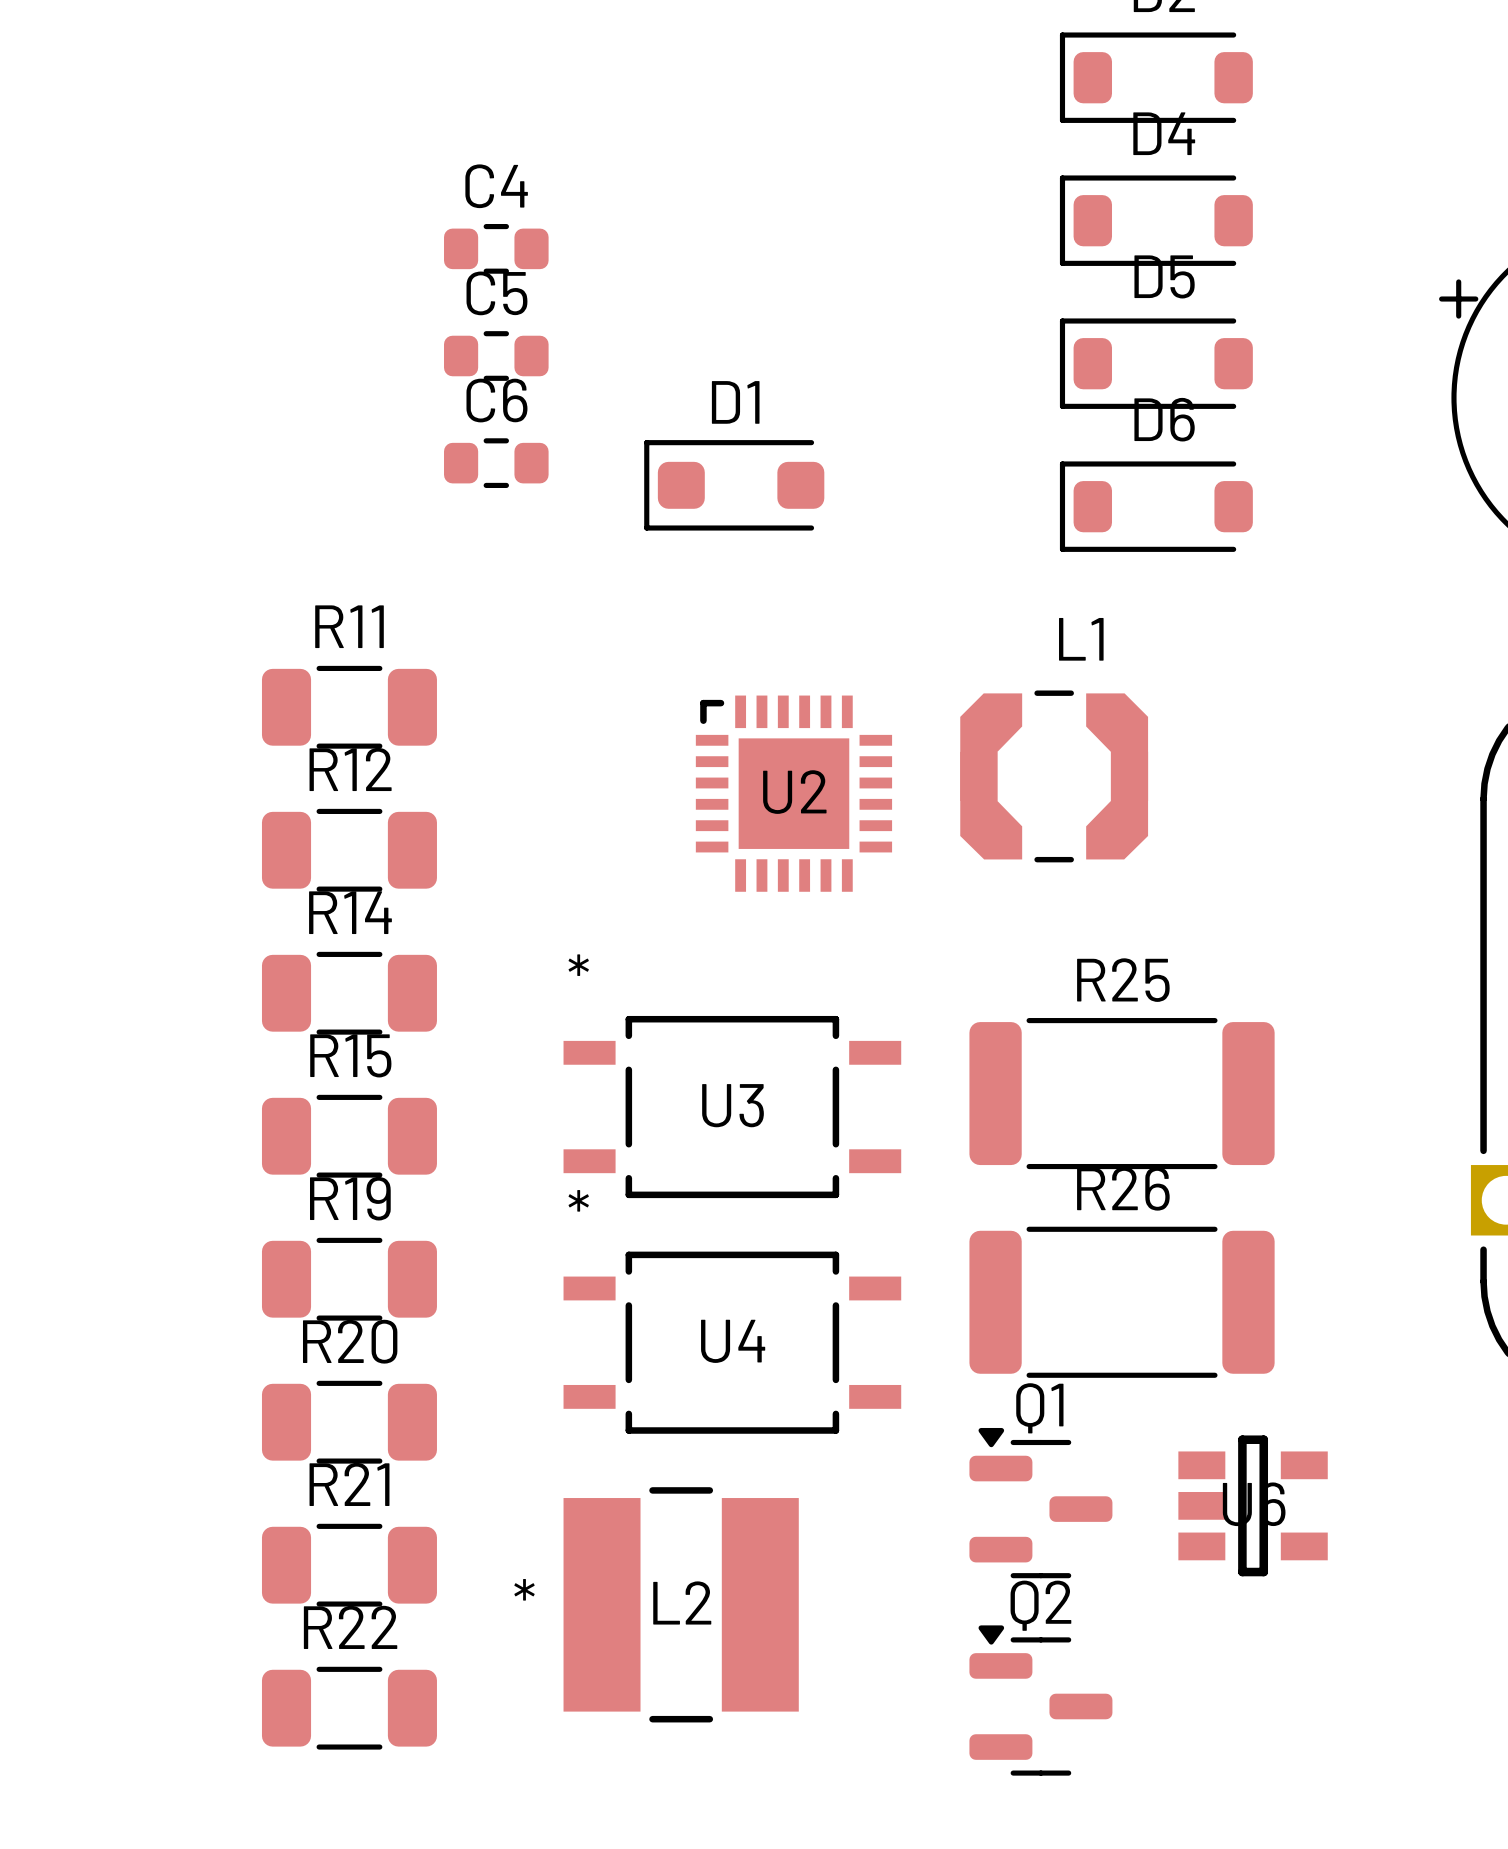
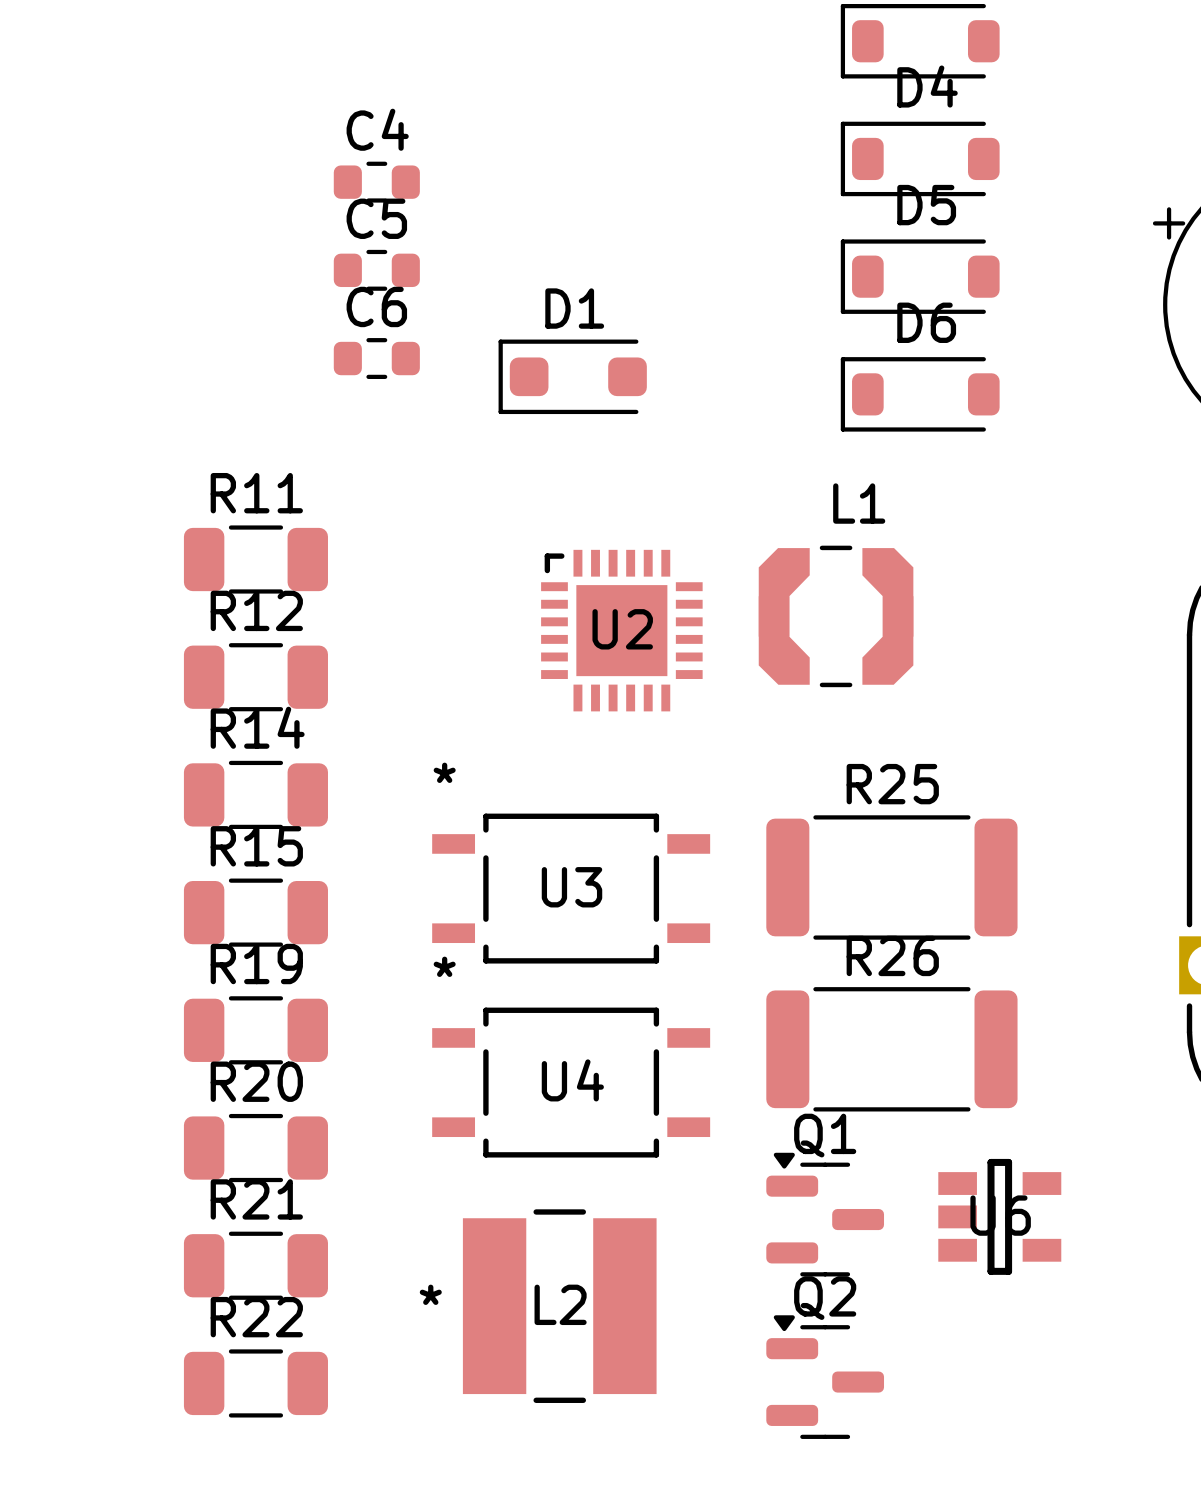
L2 position: (681, 1604) -> (559, 1306)

